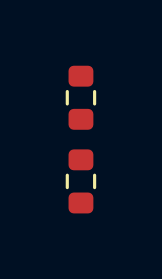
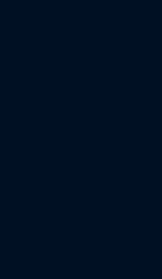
part: (80, 97) -> none
part: (80, 181) -> none

